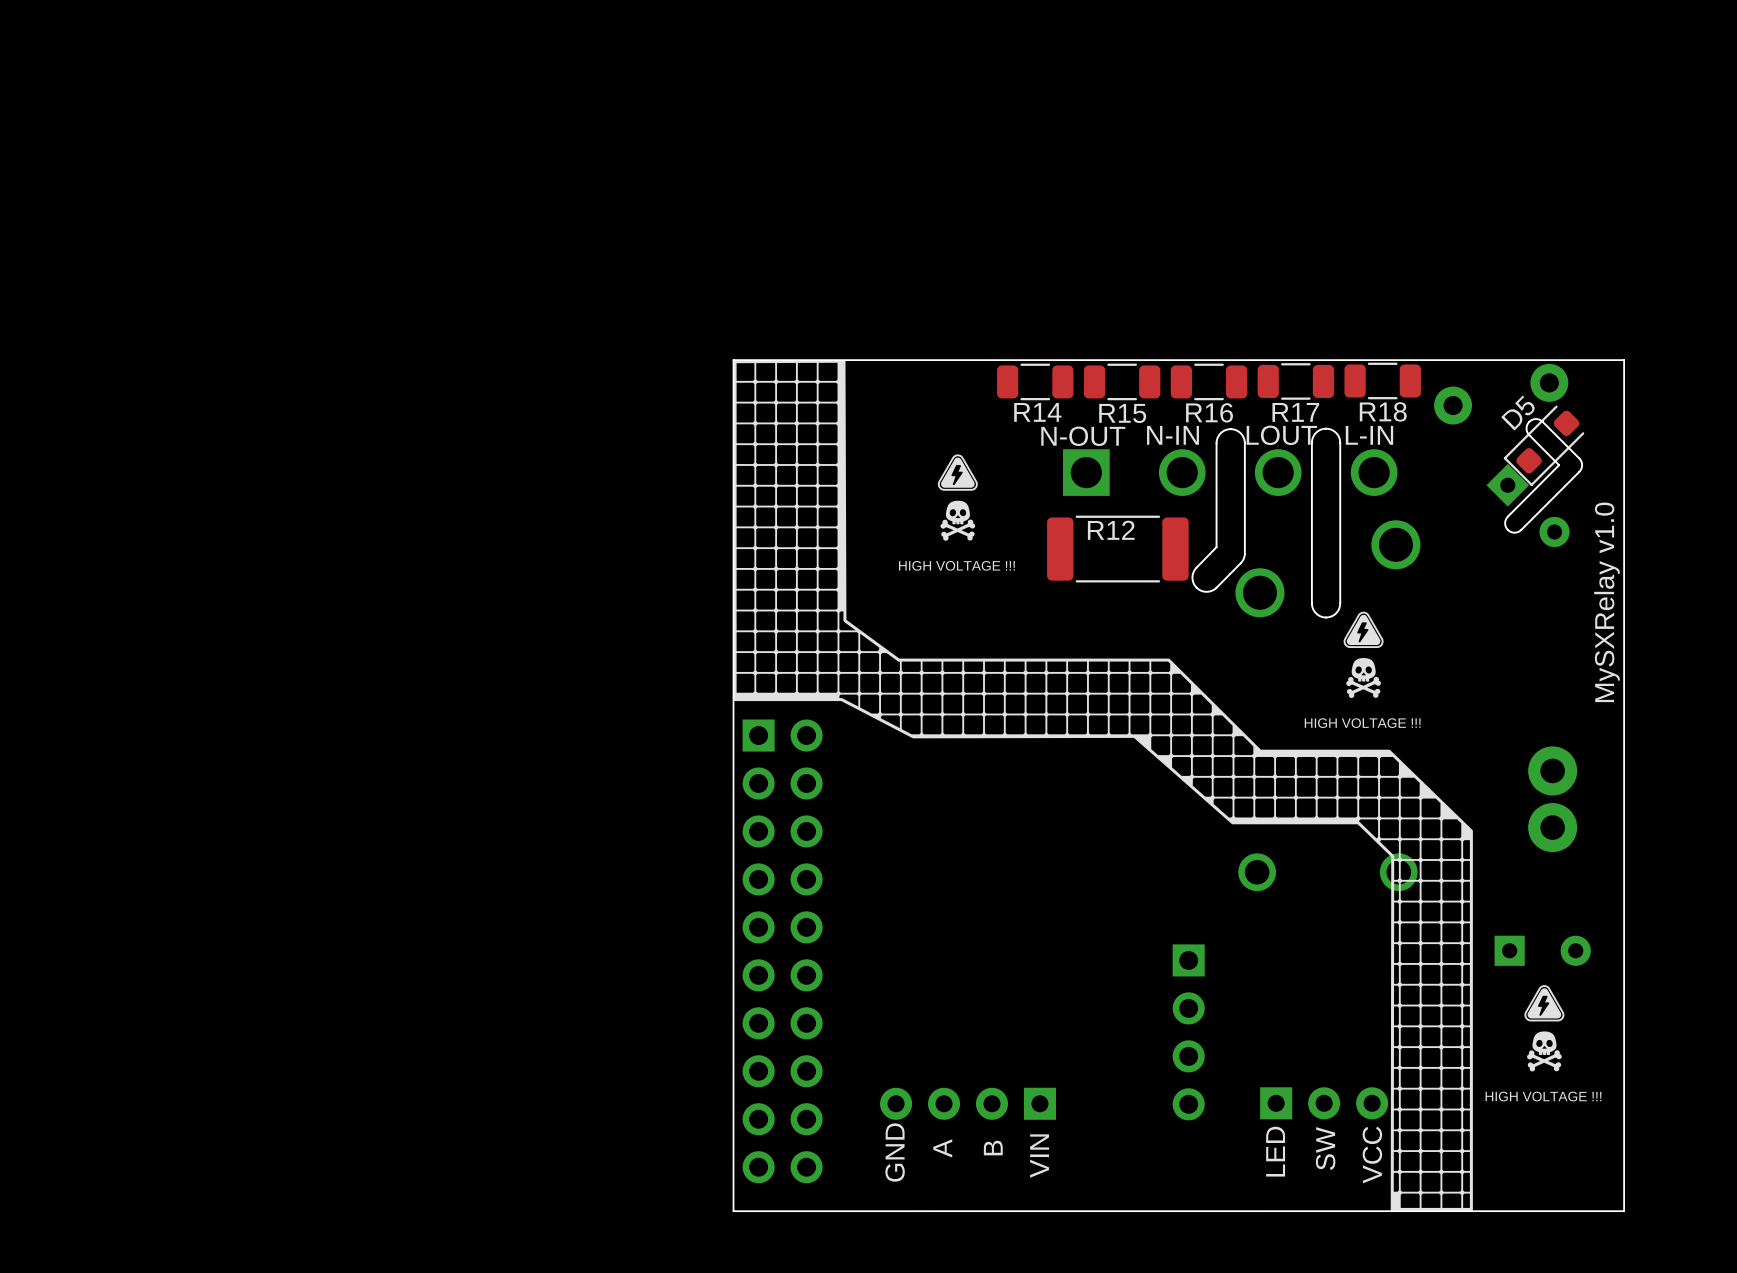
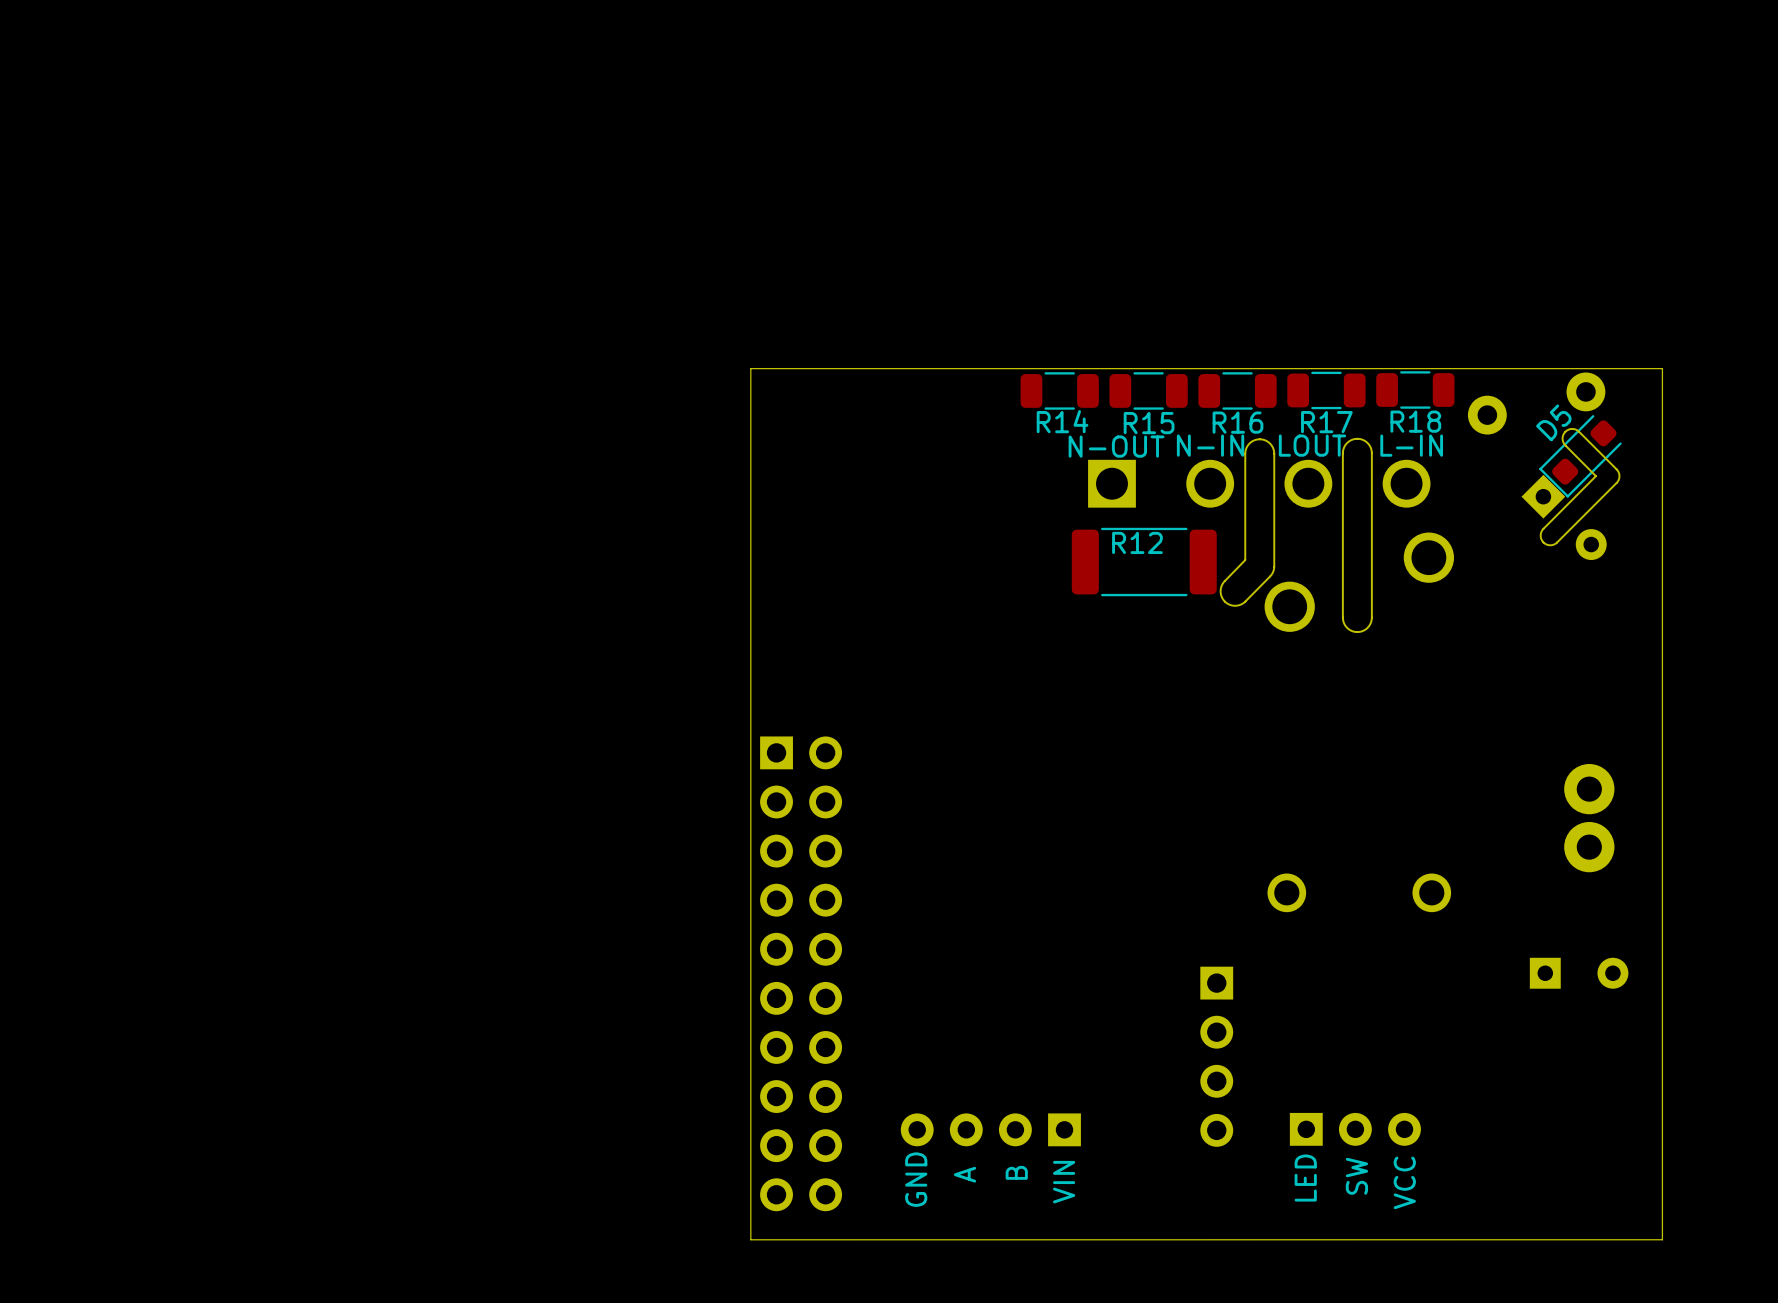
drawing: [733, 360, 1473, 1211] -> none
text: HIGH VOLTAGE !!! (956, 565) -> none
text: MySXRelay v1.0 (1606, 602) -> none
text: HIGH VOLTAGE !!! (1362, 723) -> none
drawing: [1524, 985, 1565, 1072] -> none
text: HIGH VOLTAGE !!! (1543, 1096) -> none

